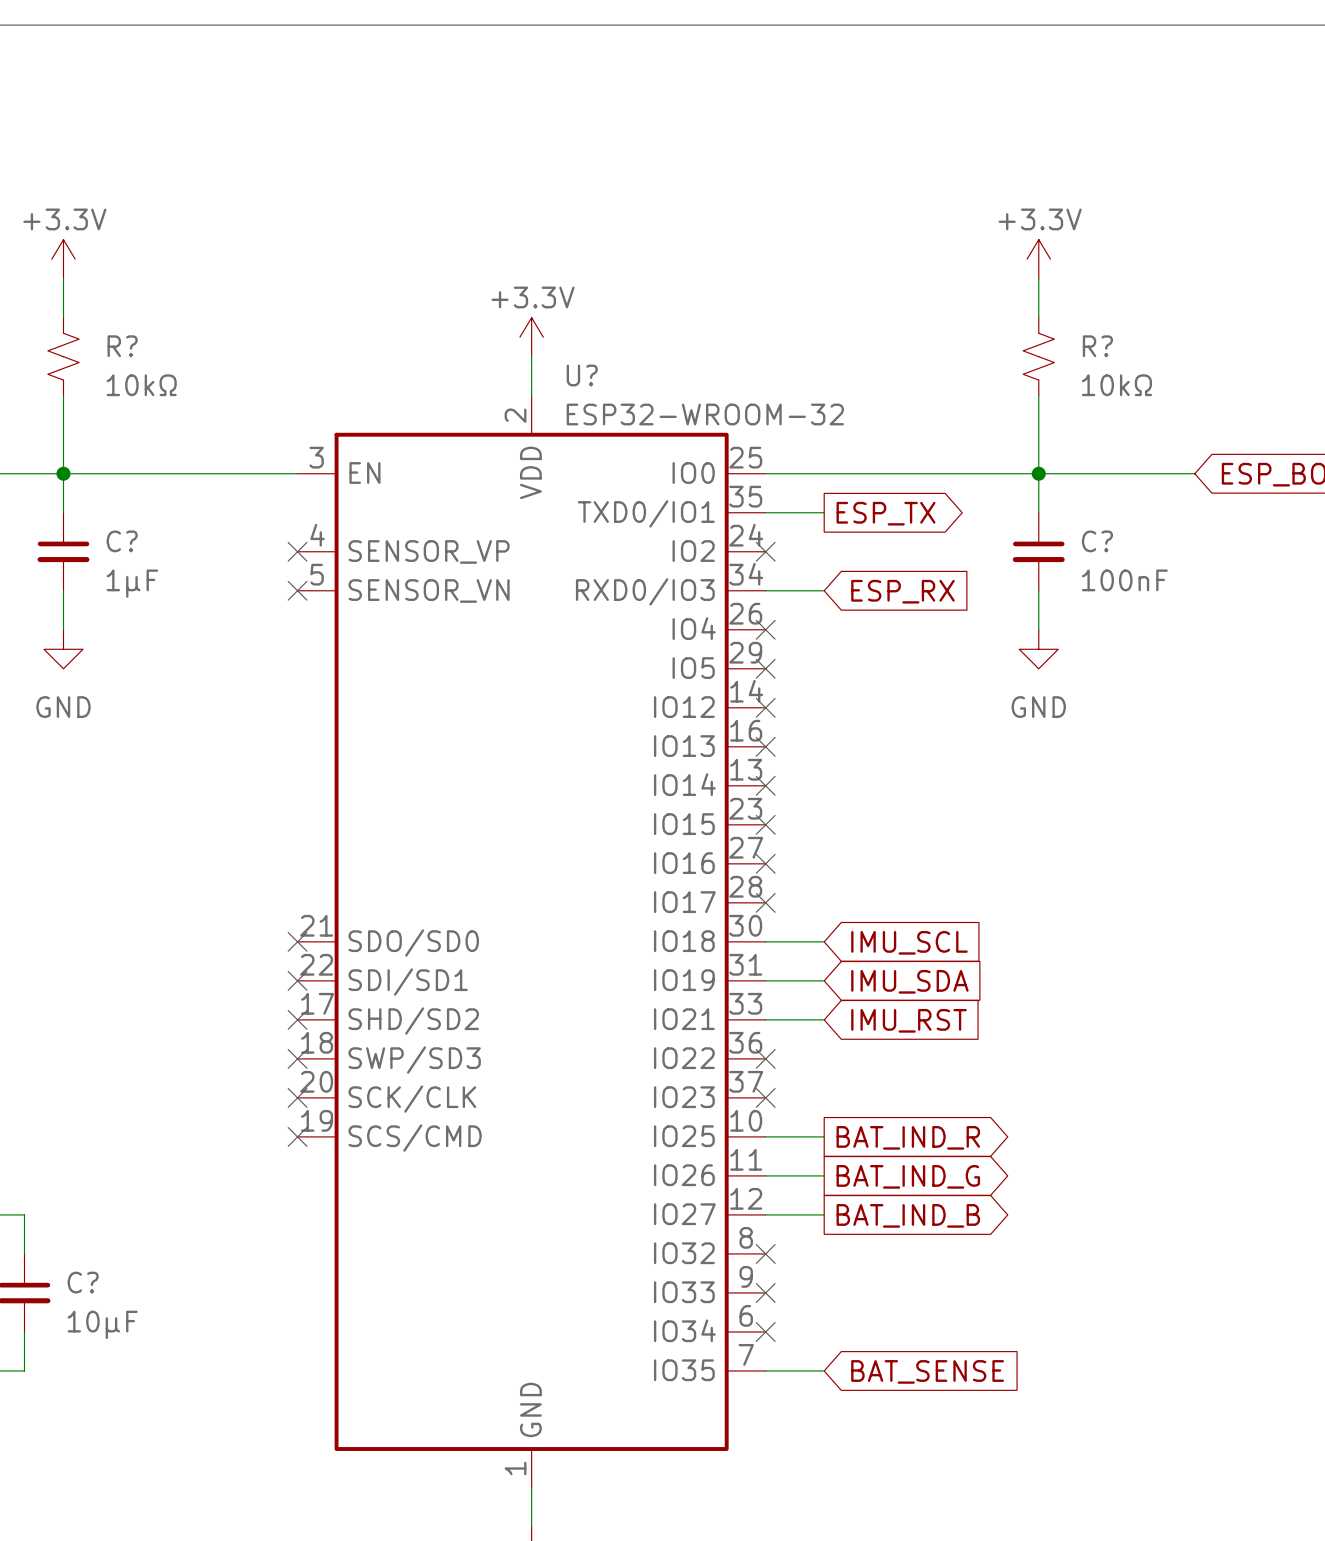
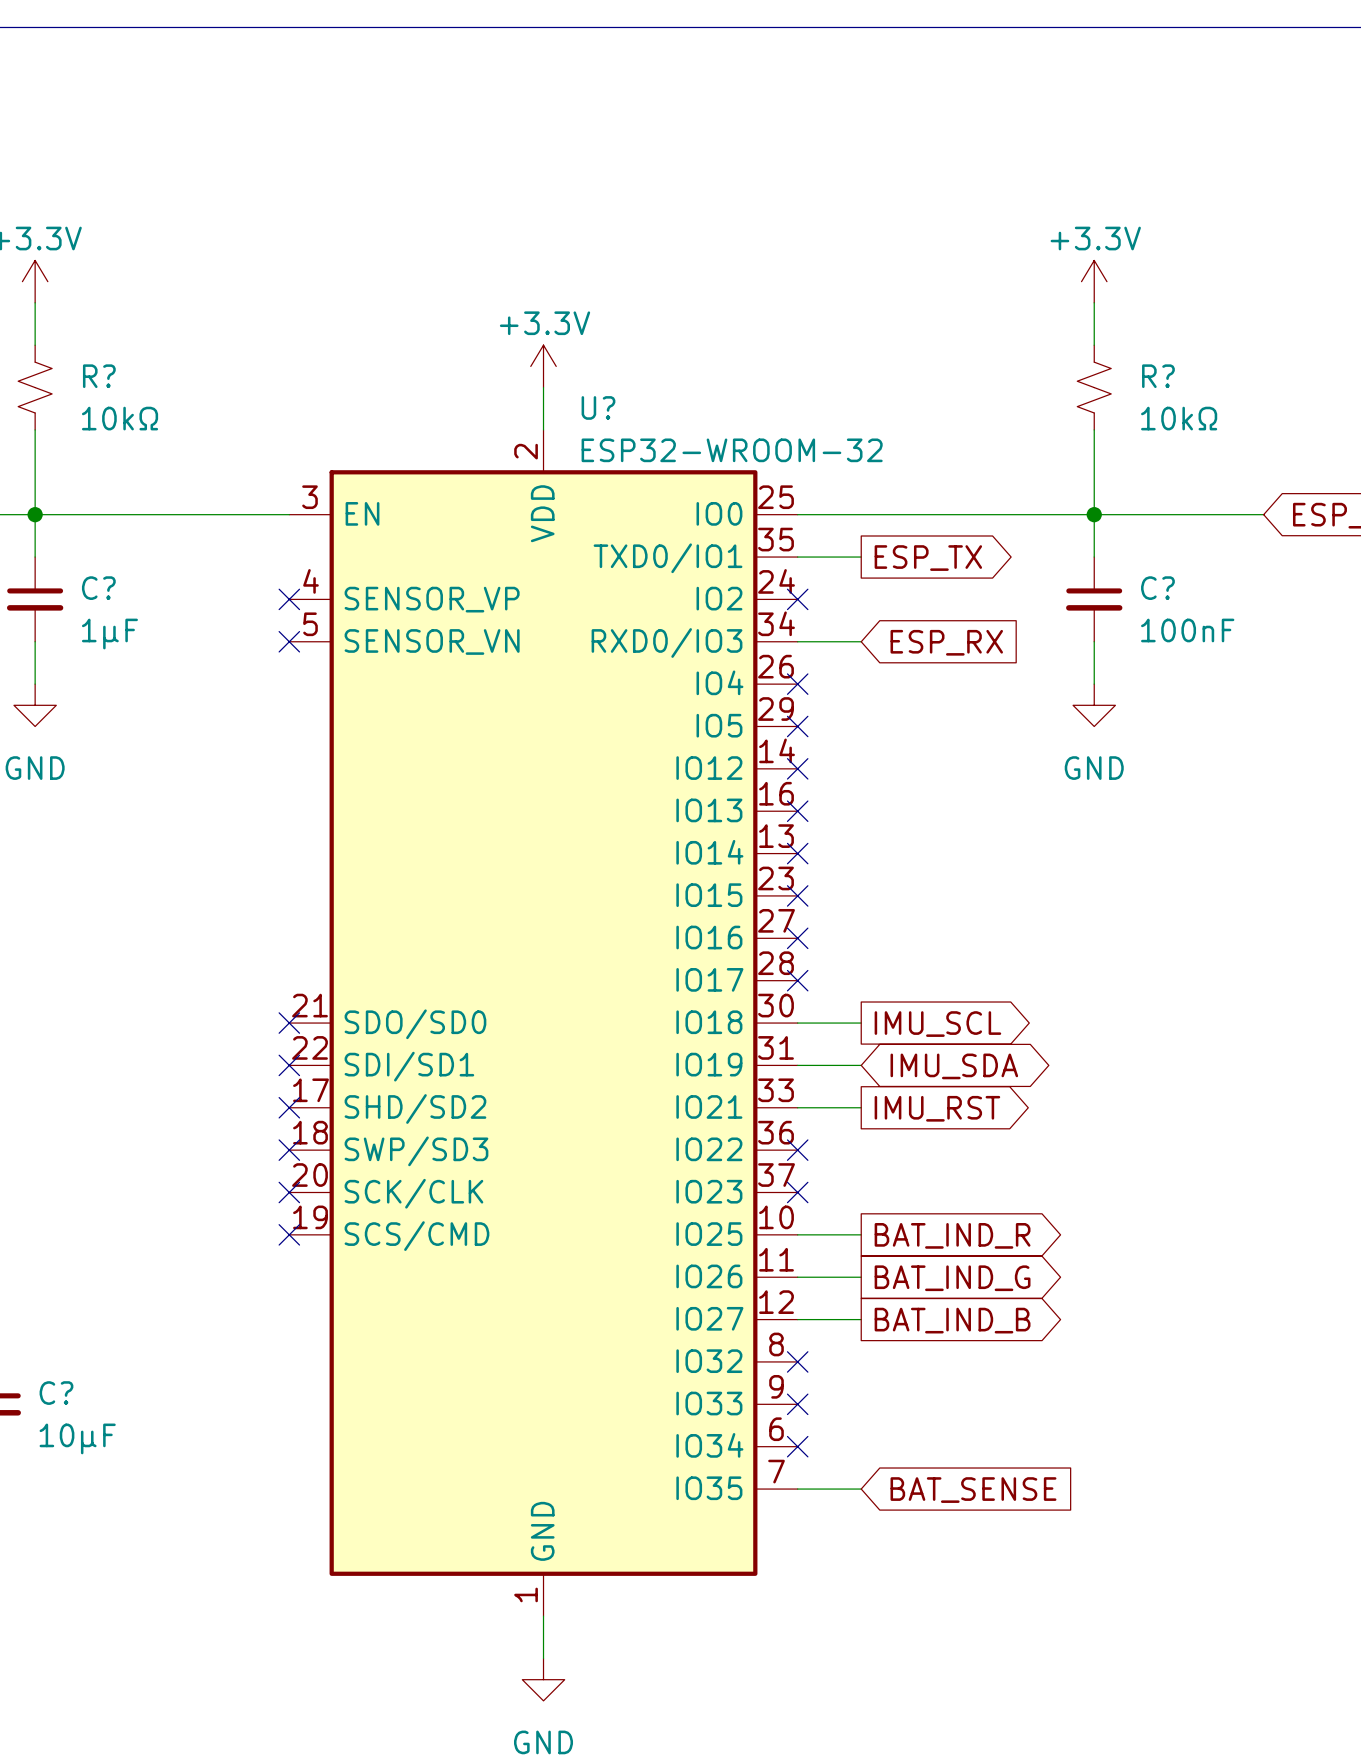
global label shape: input (909, 942) -> output (937, 1024)
global label shape: input (909, 981) -> bidirectional (954, 1066)
global label shape: input (909, 1020) -> output (937, 1108)

